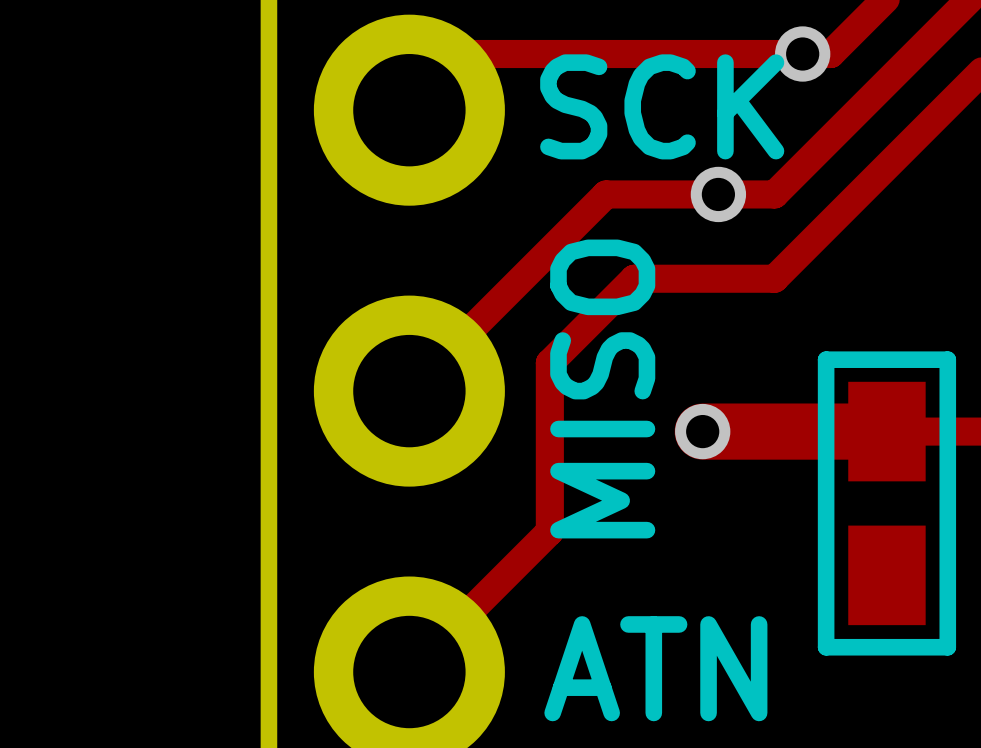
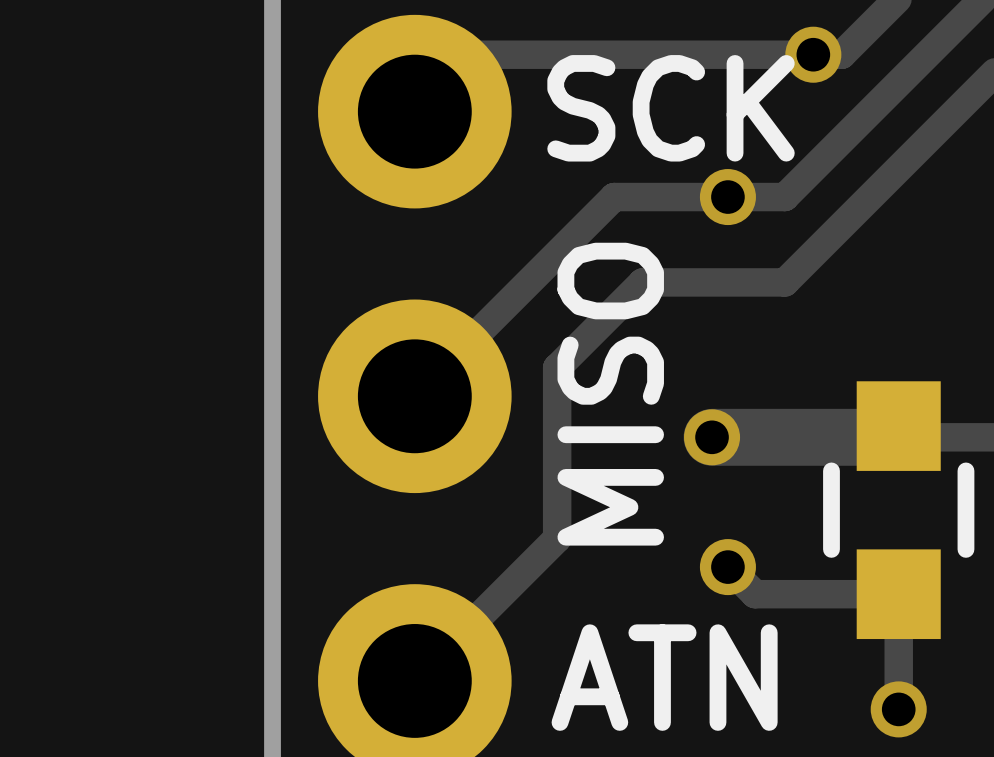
part footprint: [817, 351, 957, 656] -> [823, 381, 975, 640]
track: none -> (727, 567) (755, 594) (898, 594) (898, 709)
via: none -> (727, 567)
via: none -> (898, 709)

